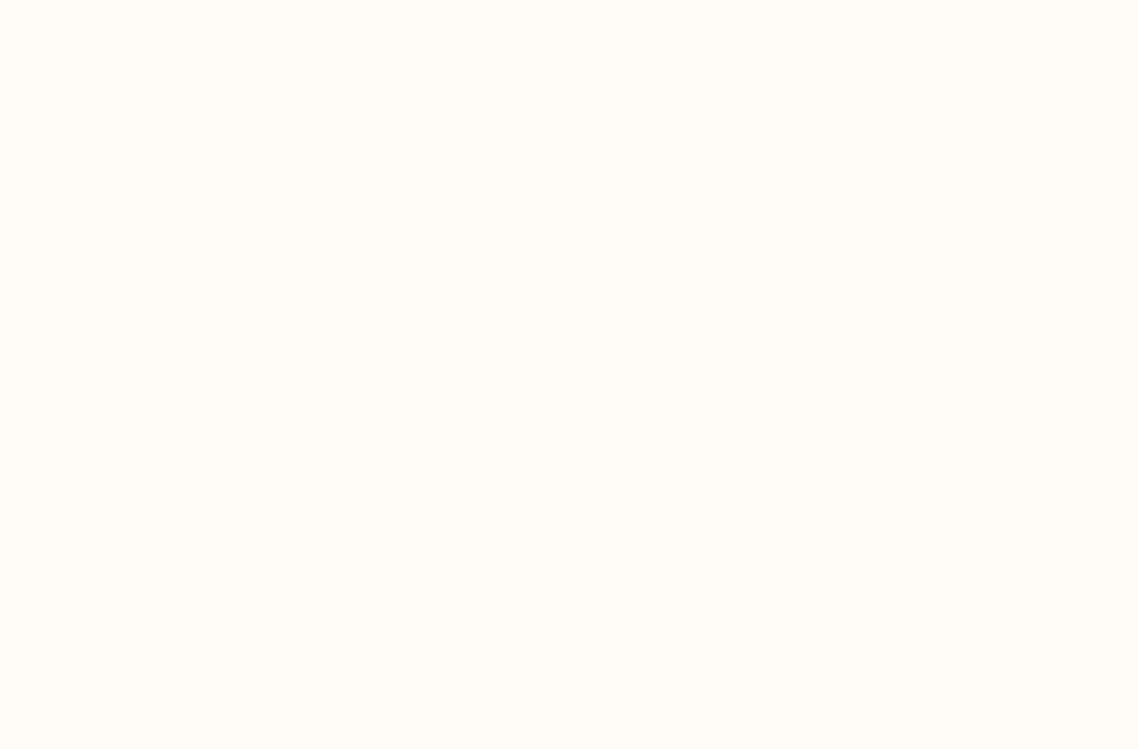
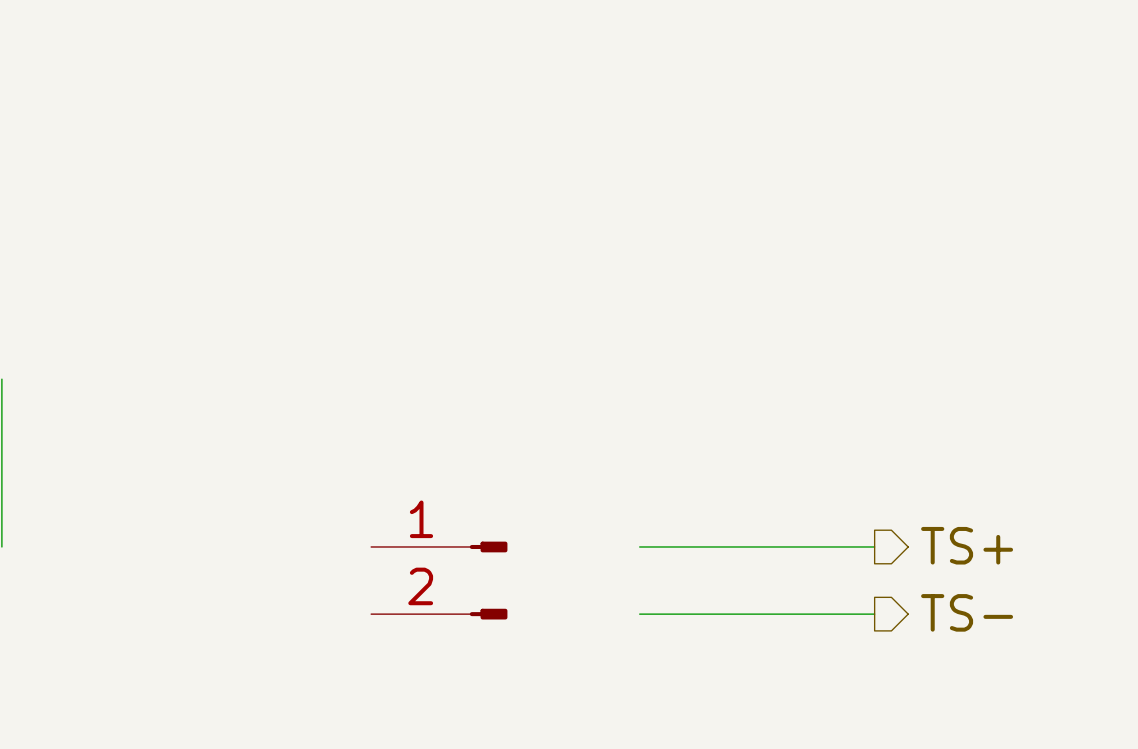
wire: none -> (1, 379) (1, 546)
hierarchical label: none -> TS+ (967, 545)
wire: none -> (639, 546) (874, 546)
part: none -> (439, 580)
hierarchical label: none -> TS- (967, 612)
wire: none -> (639, 614) (874, 614)

